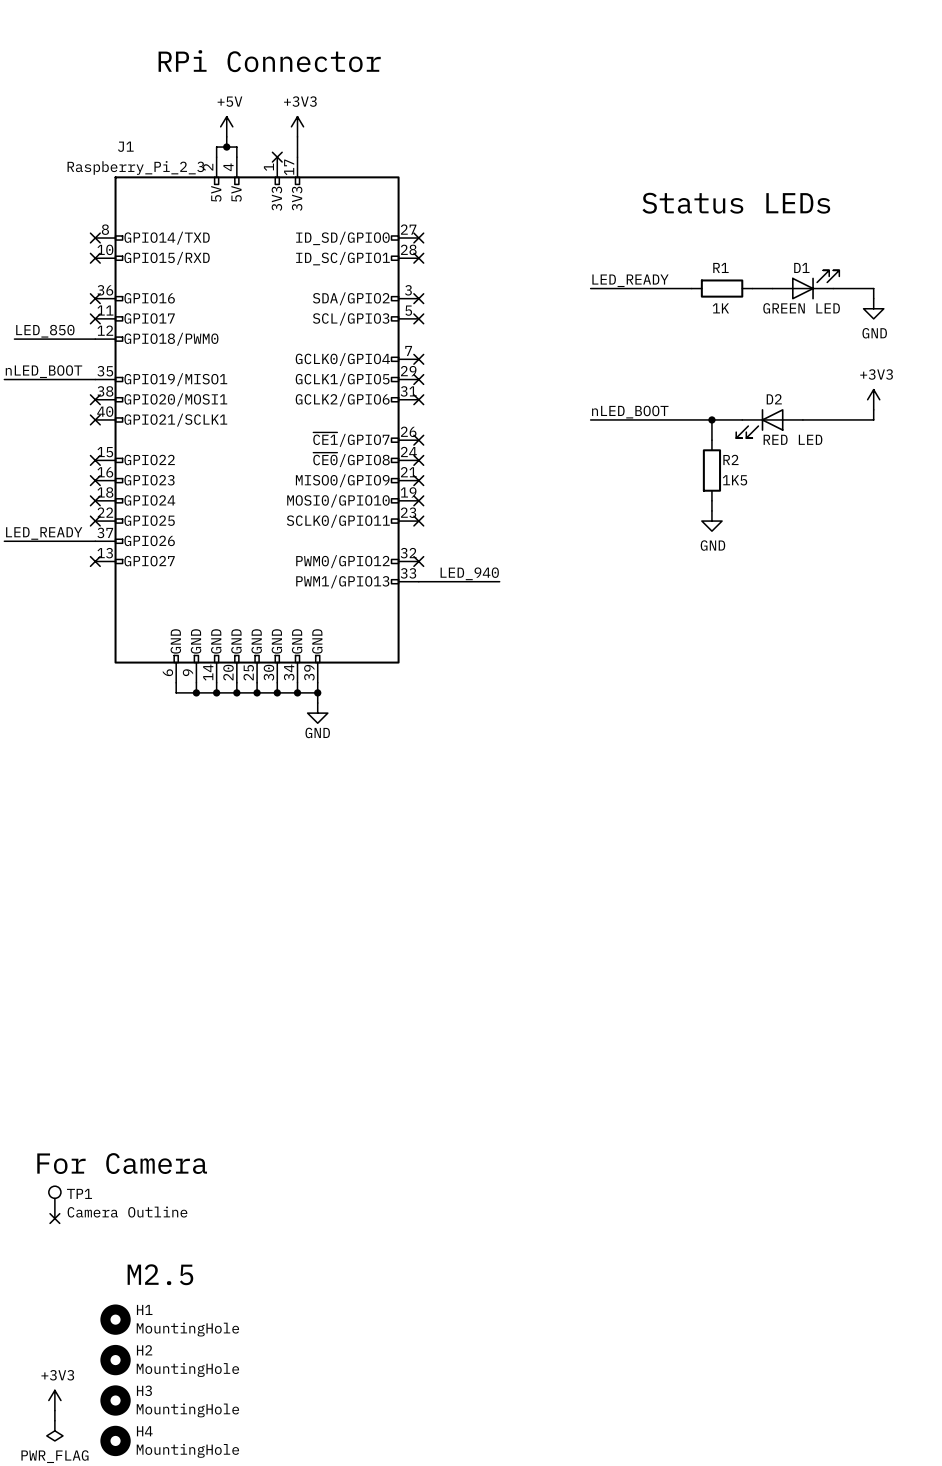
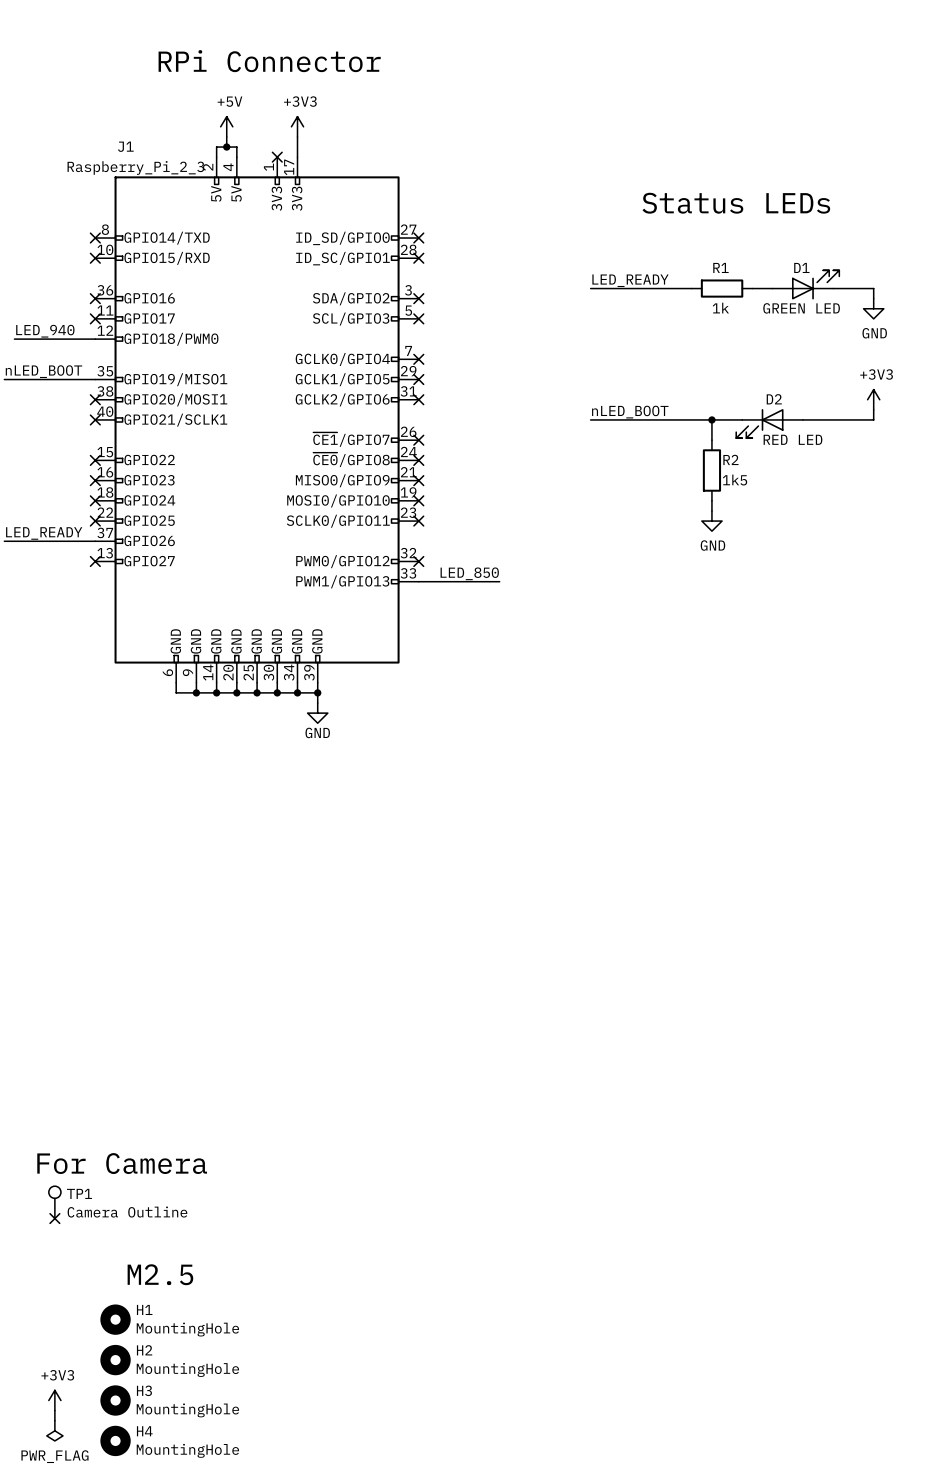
R1 value: 1K (720, 308) -> 1k (720, 308)
label: LED_850 (45, 331) -> LED_940 (45, 331)
R2 value: 1K5 (734, 480) -> 1k5 (734, 480)
label: LED_940 (469, 573) -> LED_850 (469, 573)

